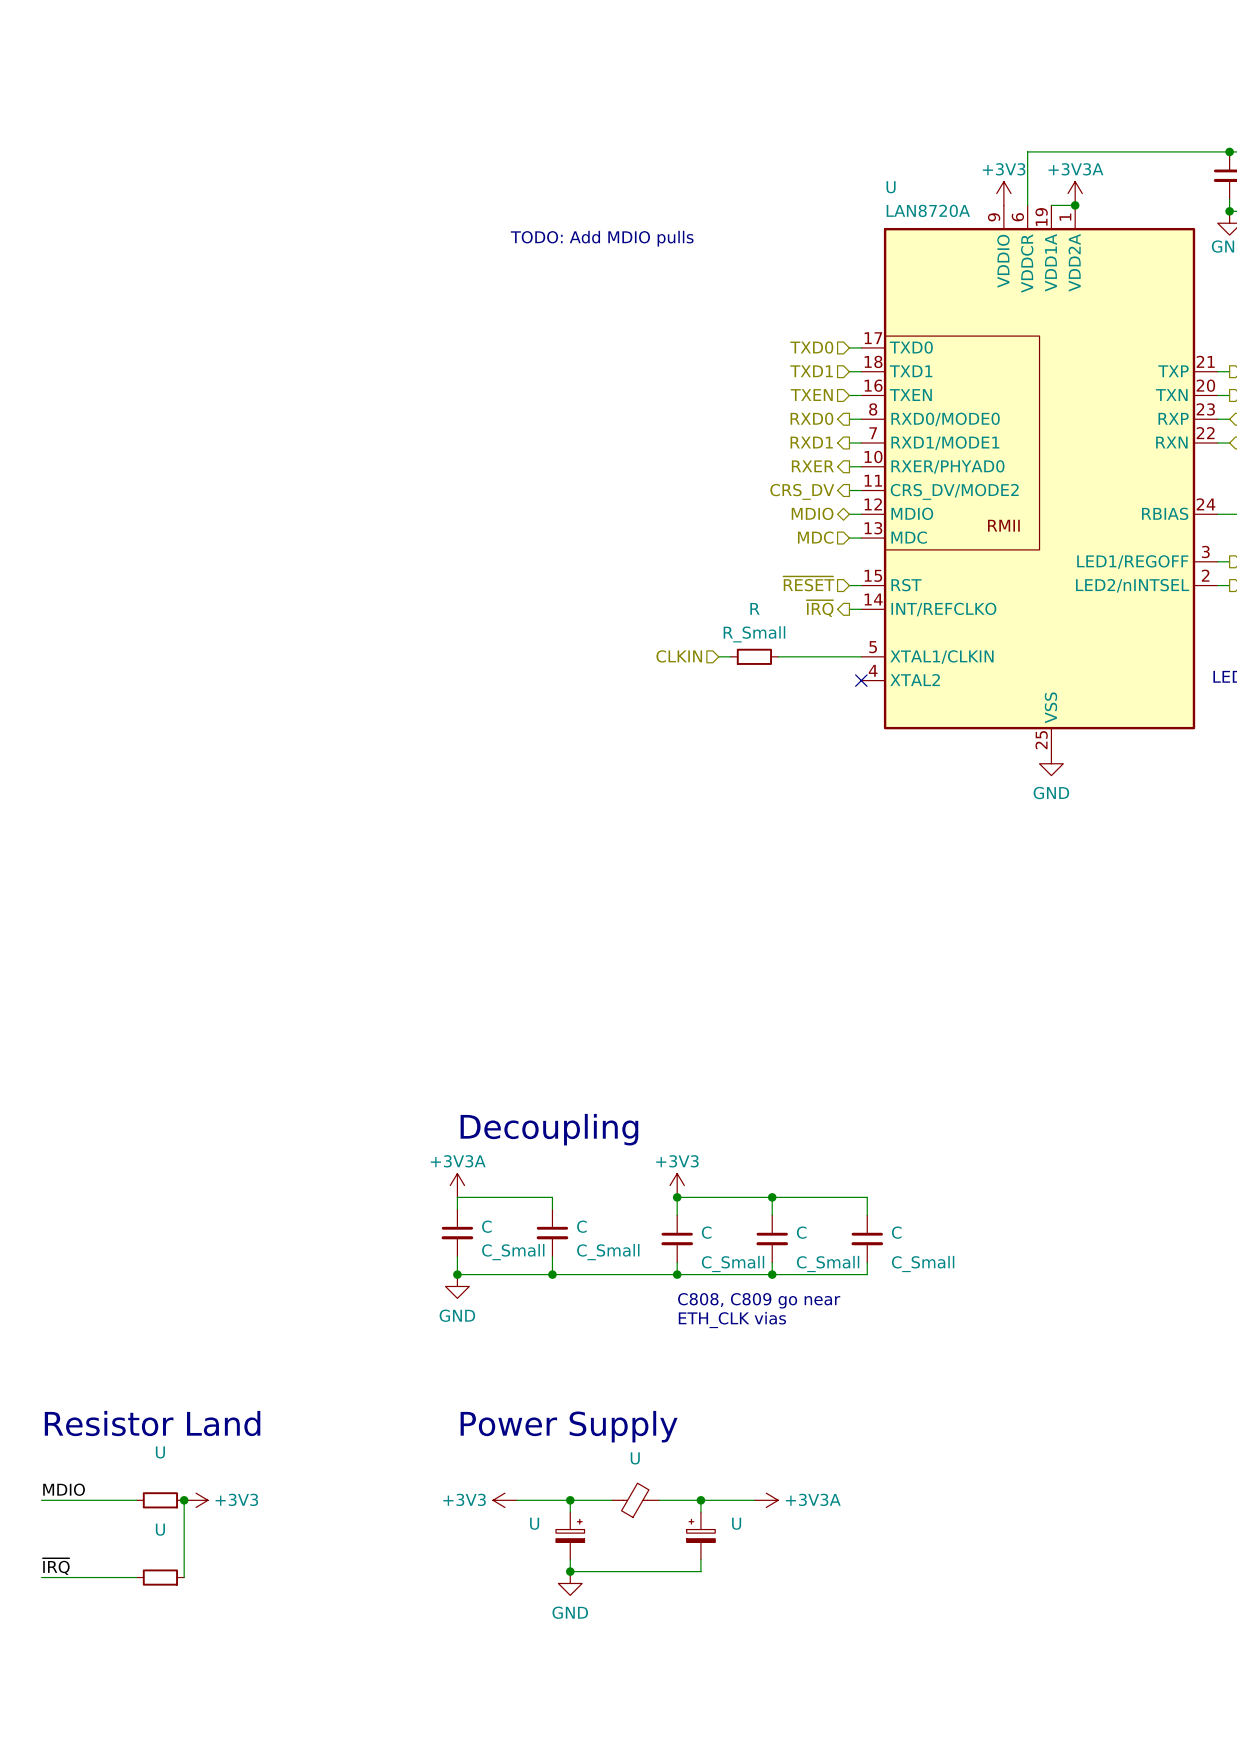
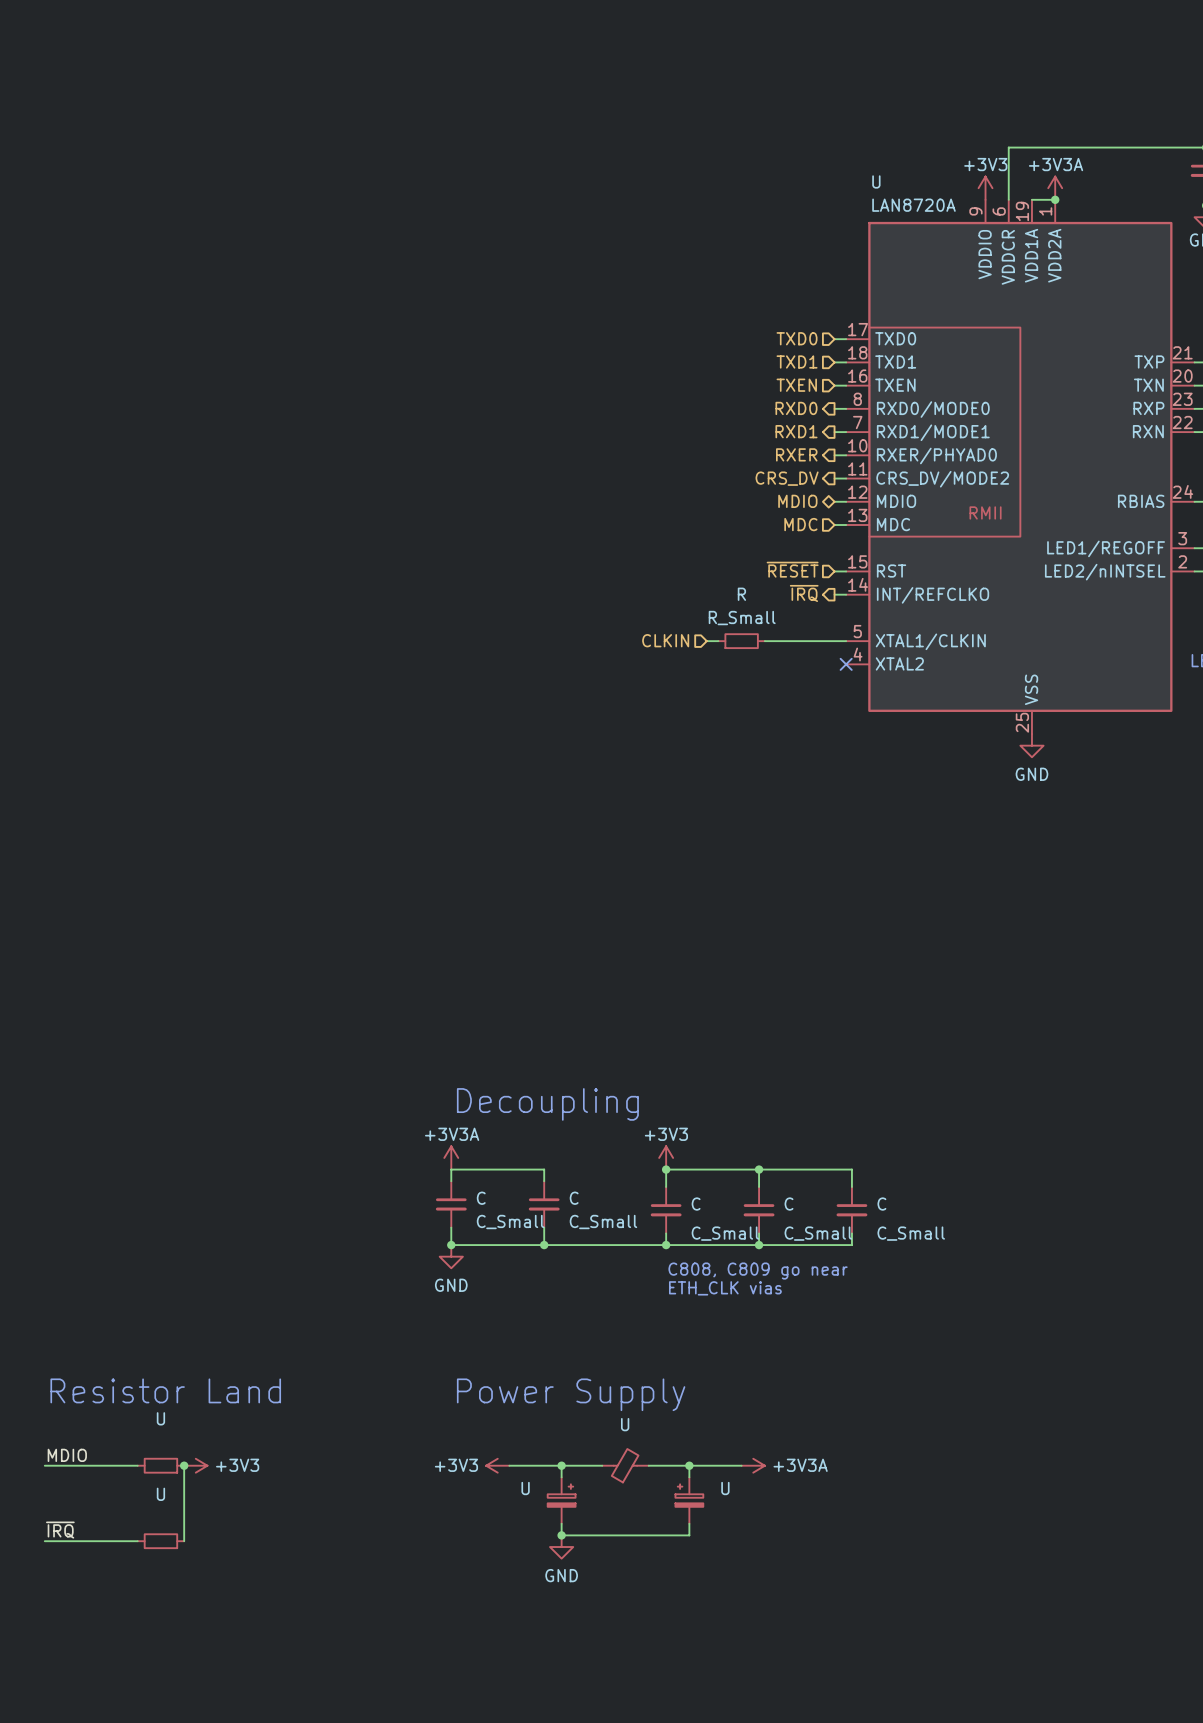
text: TODO: Add MDIO pulls (602, 238) -> none

